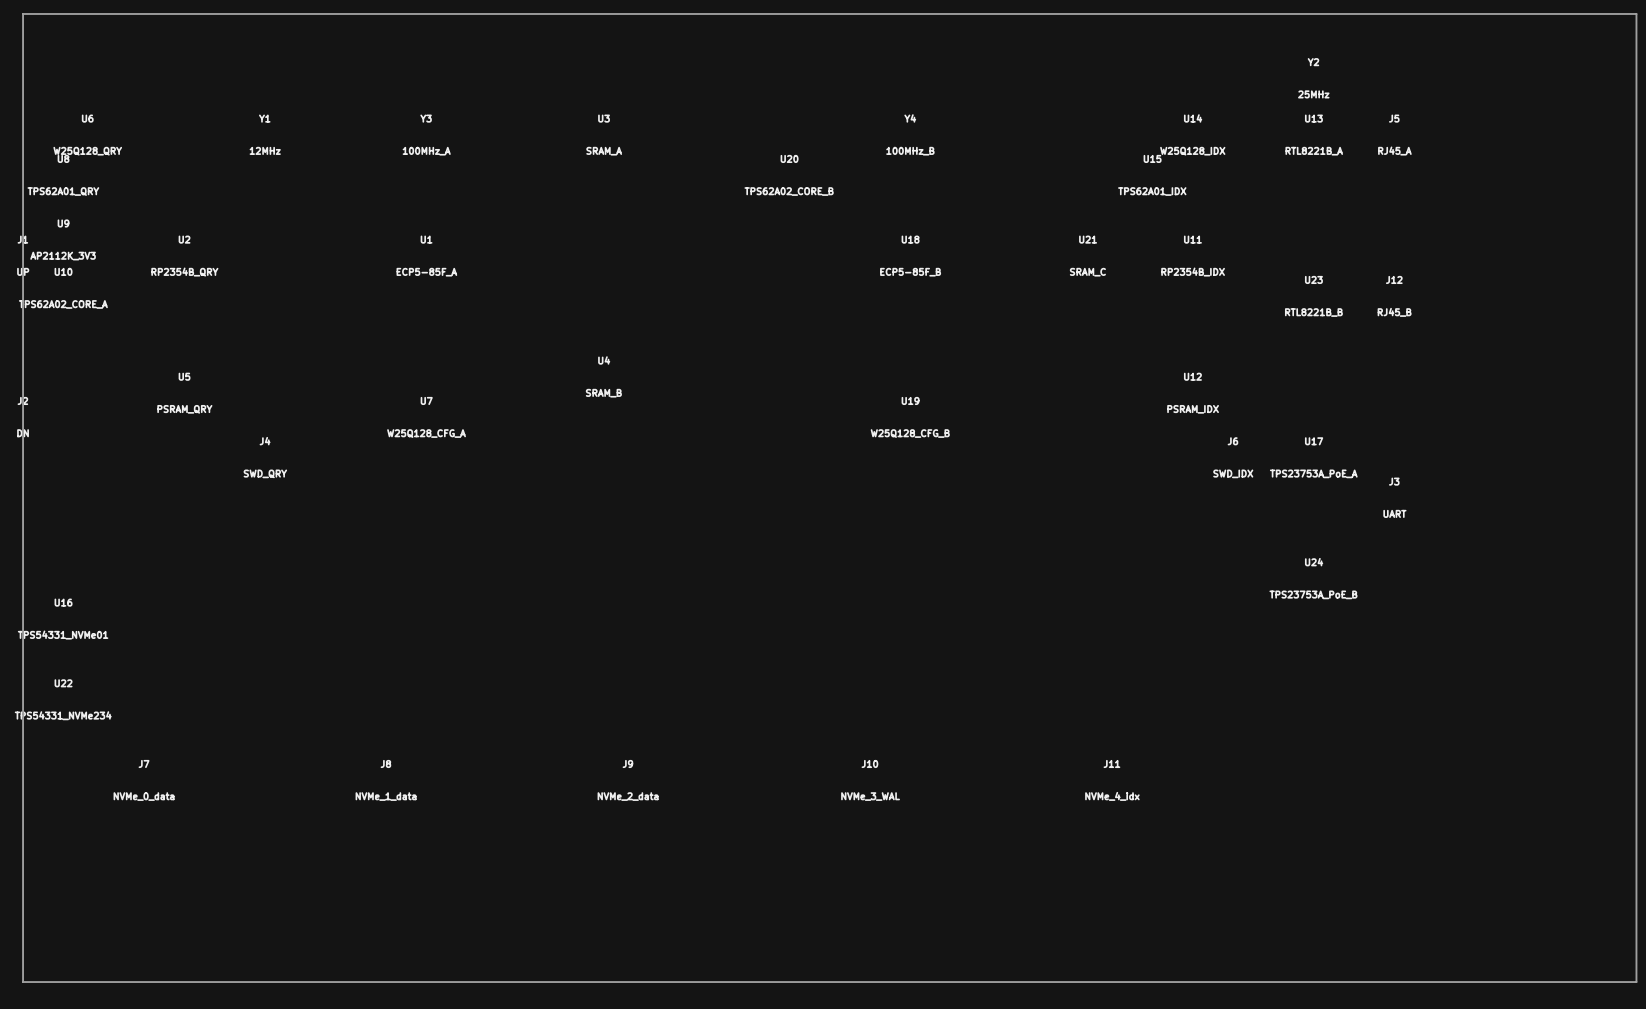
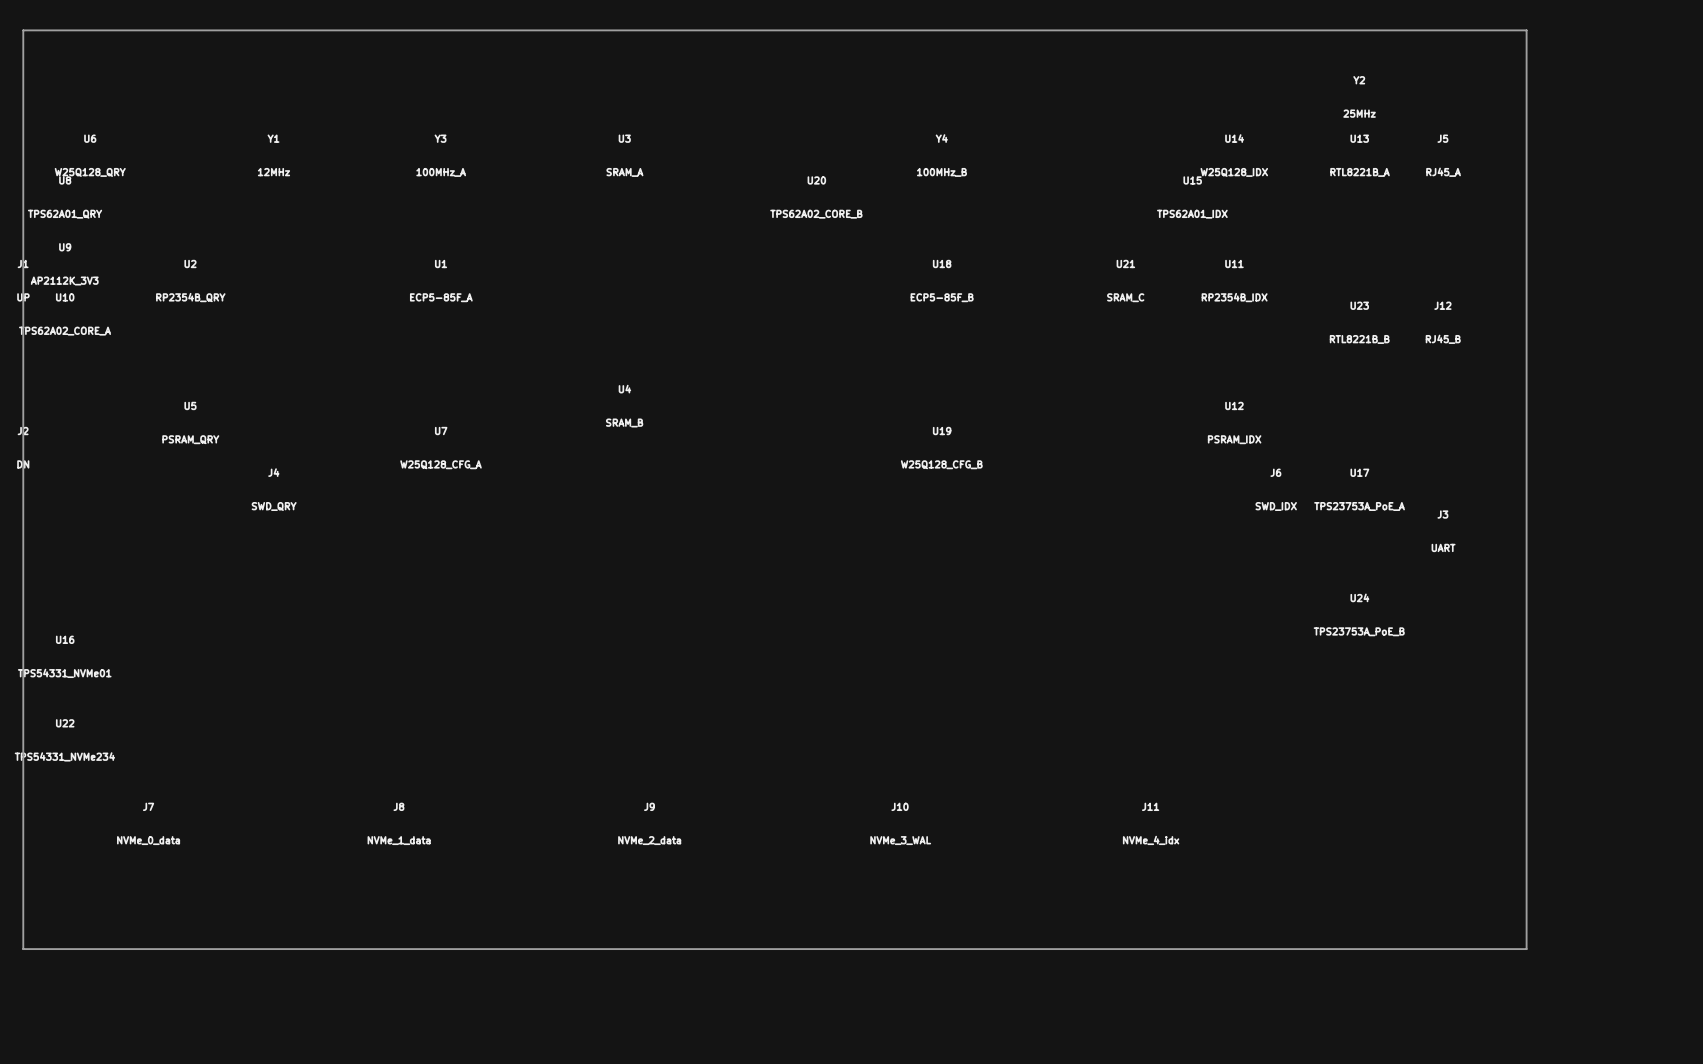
board edge: (1475, 13) (1636, 13) (1636, 982) (23, 982) (23, 901) -> (1526, 30) (1526, 949) (23, 949)

